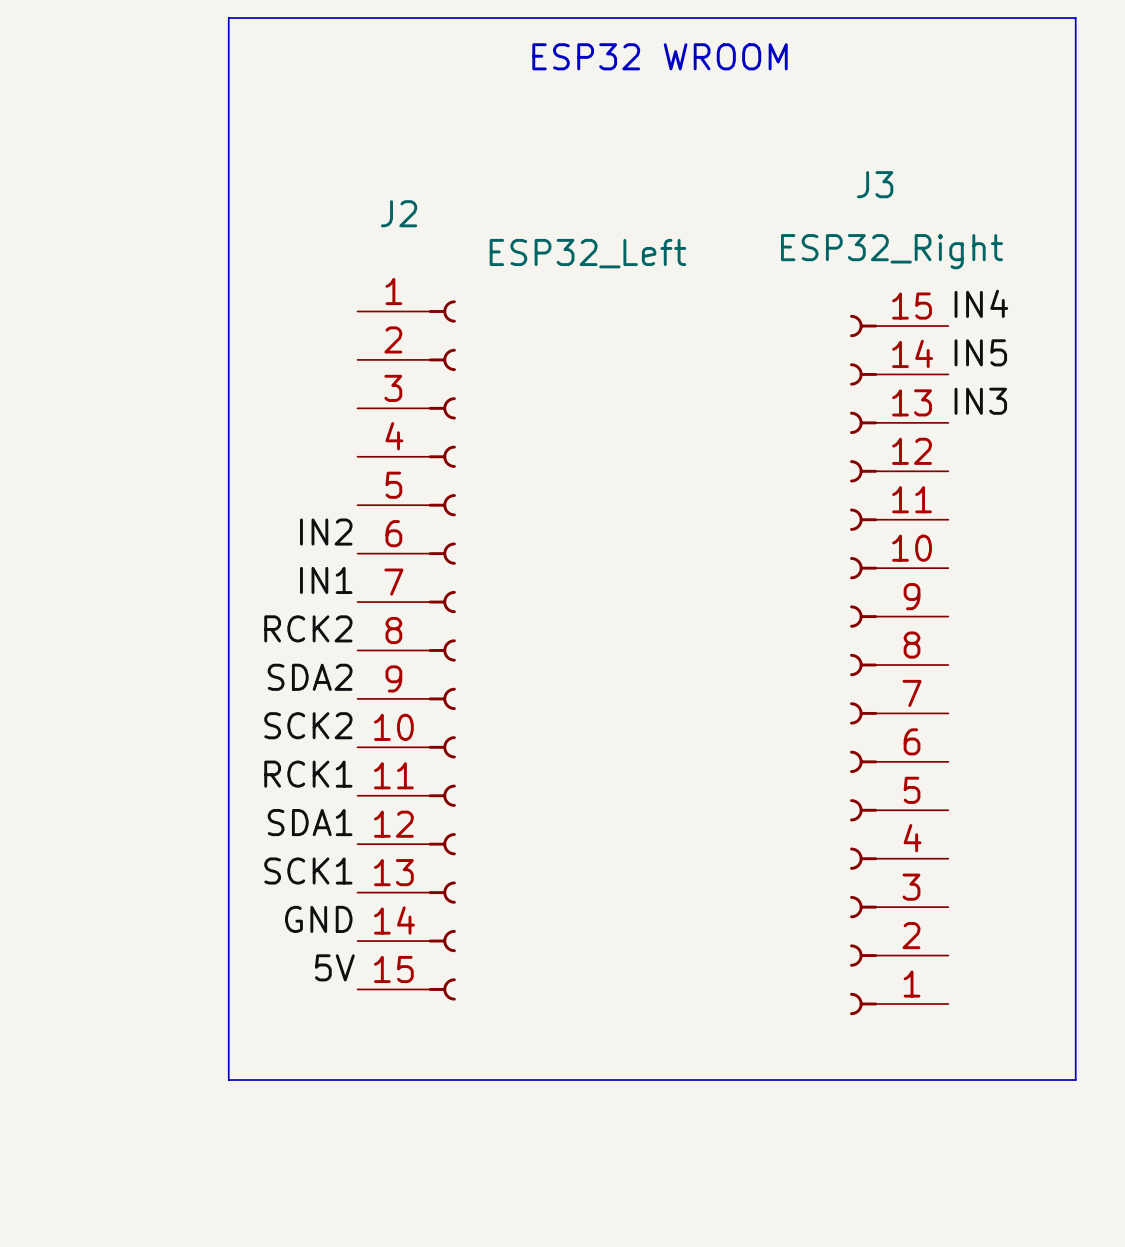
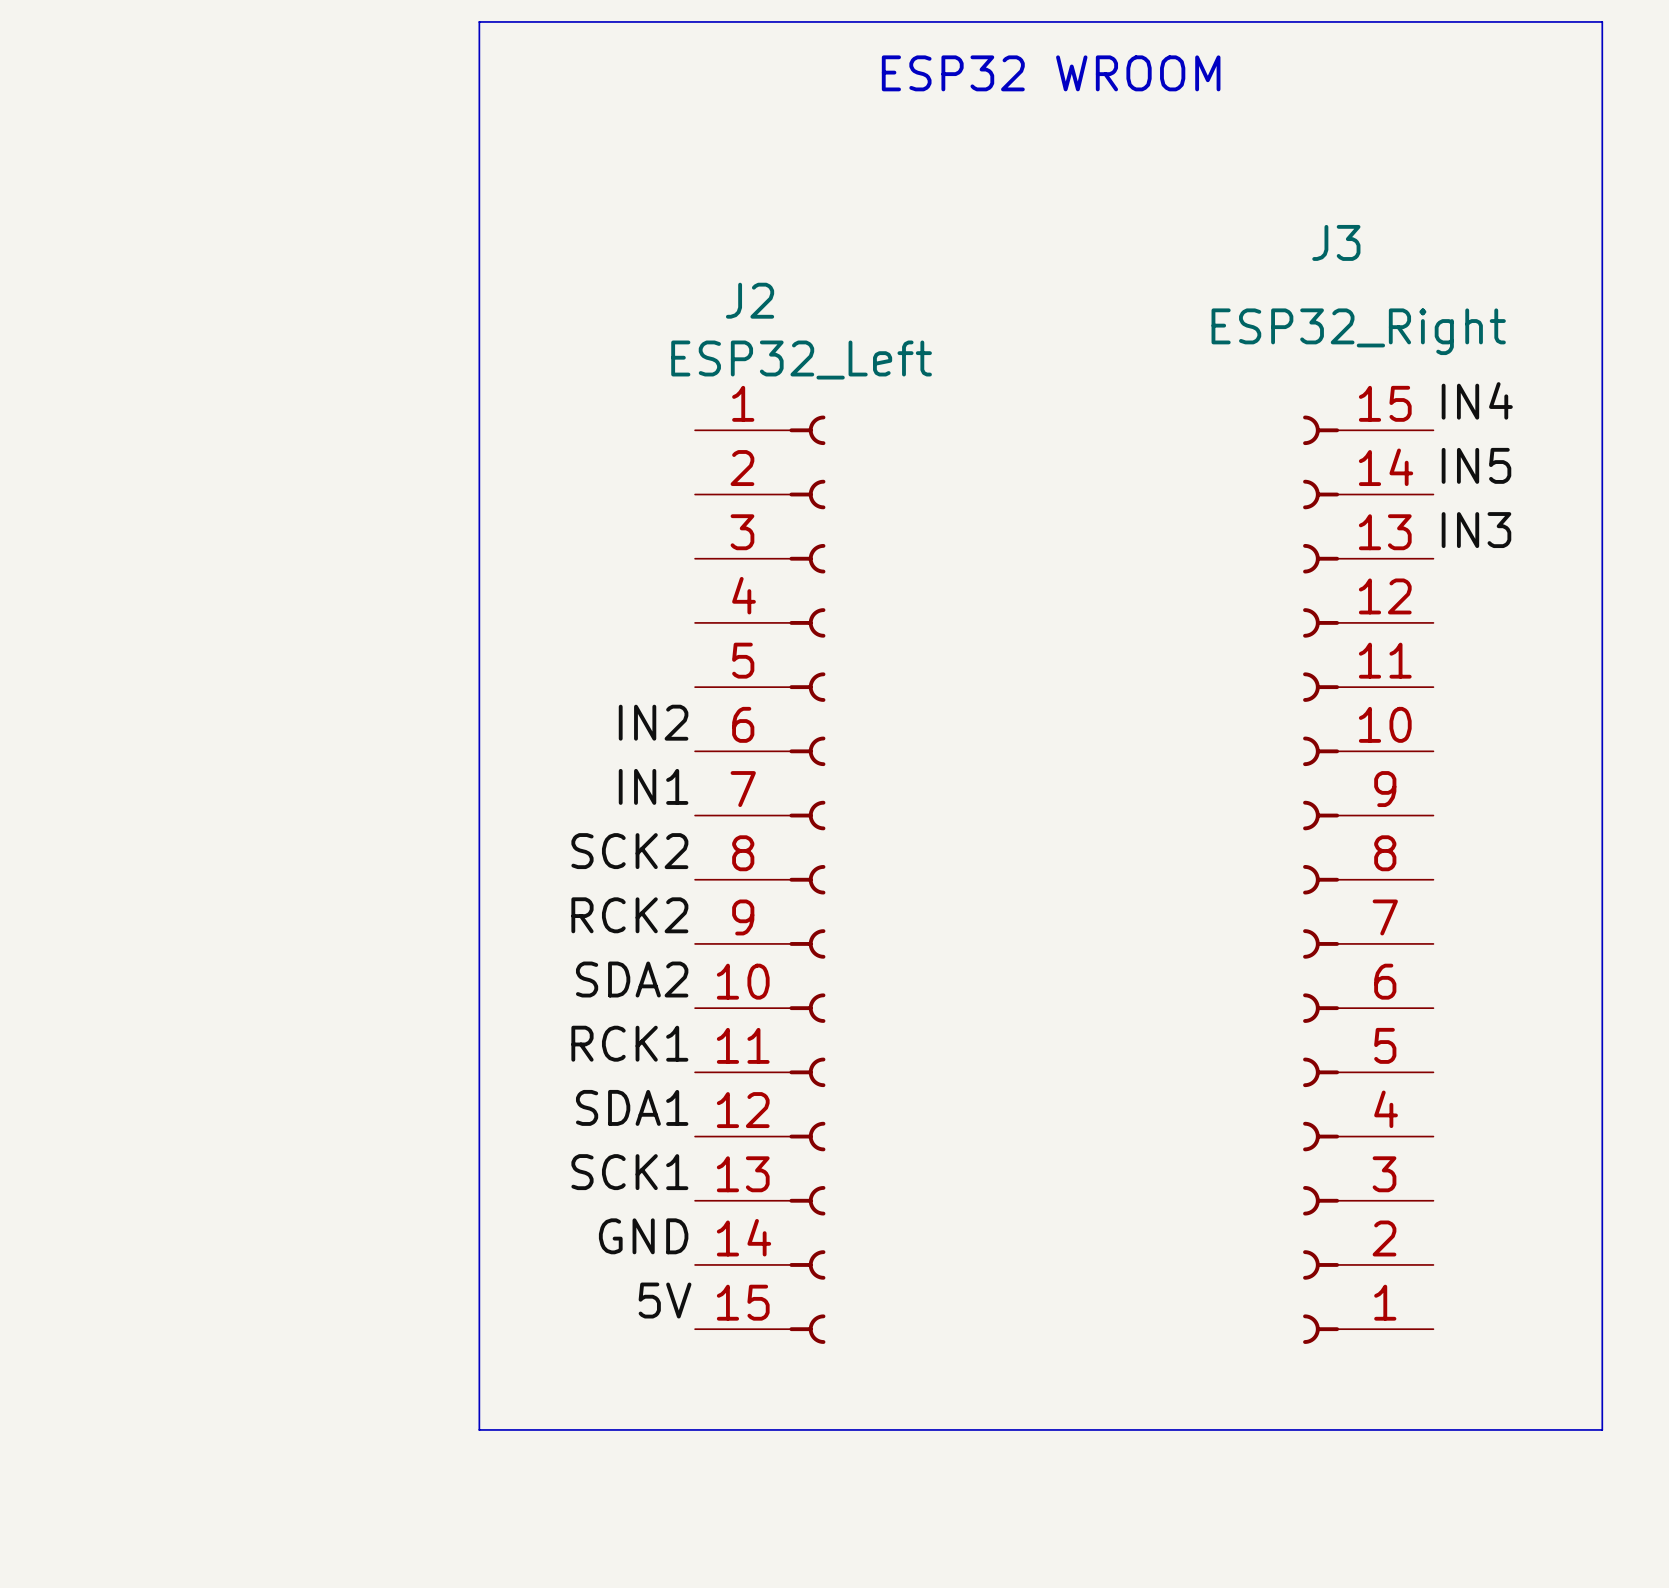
J2 value position: ESP32_Left (587, 253) -> ESP32_Left (801, 360)
label position: IN2 (326, 532) -> IN2 (653, 722)
label position: IN1 (326, 580) -> IN1 (653, 786)
label position: RCK2 (308, 628) -> RCK2 (629, 915)
J2 position: (406, 650) -> (760, 879)
label position: SDA2 (310, 677) -> SDA2 (632, 979)
label position: SCK2 (308, 725) -> SCK2 (629, 851)
label position: RCK1 (308, 774) -> RCK1 (629, 1043)
label position: SDA1 (310, 822) -> SDA1 (632, 1107)
label position: SCK1 (308, 870) -> SCK1 (629, 1172)
label position: GND (318, 919) -> GND (643, 1236)
label position: 5V (334, 967) -> 5V (665, 1300)

